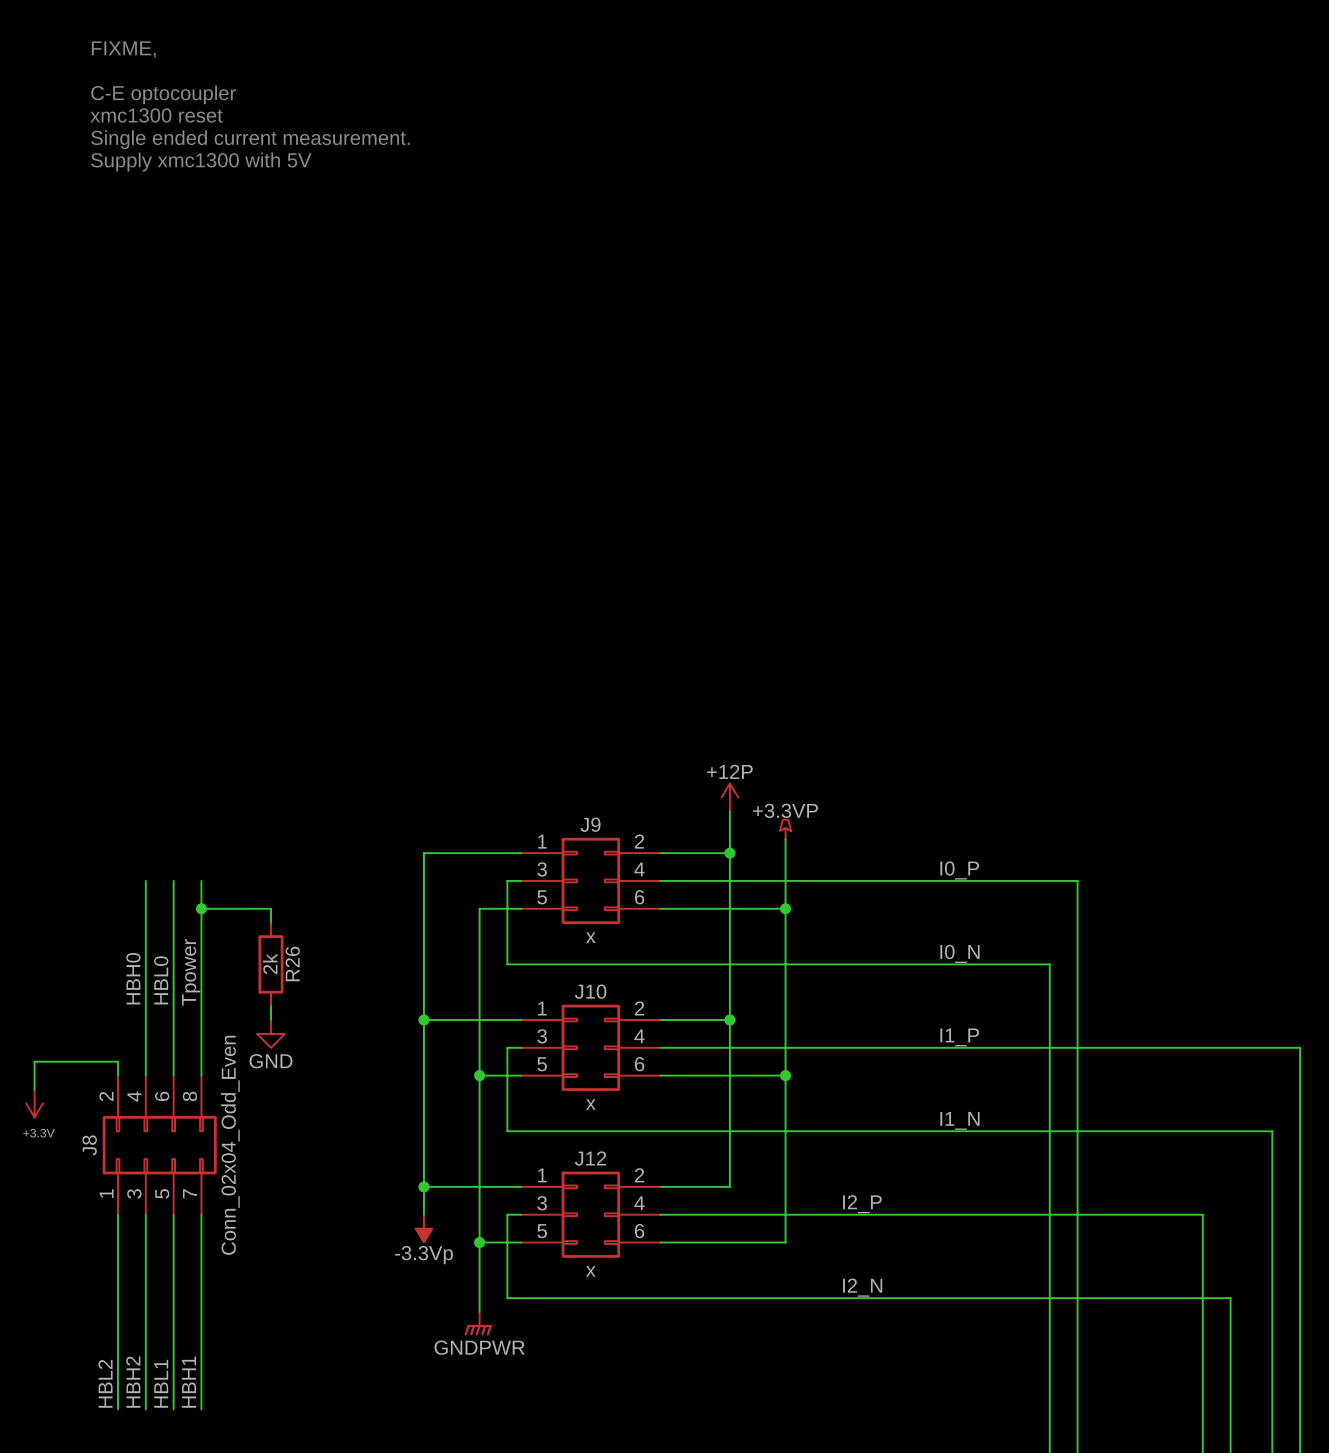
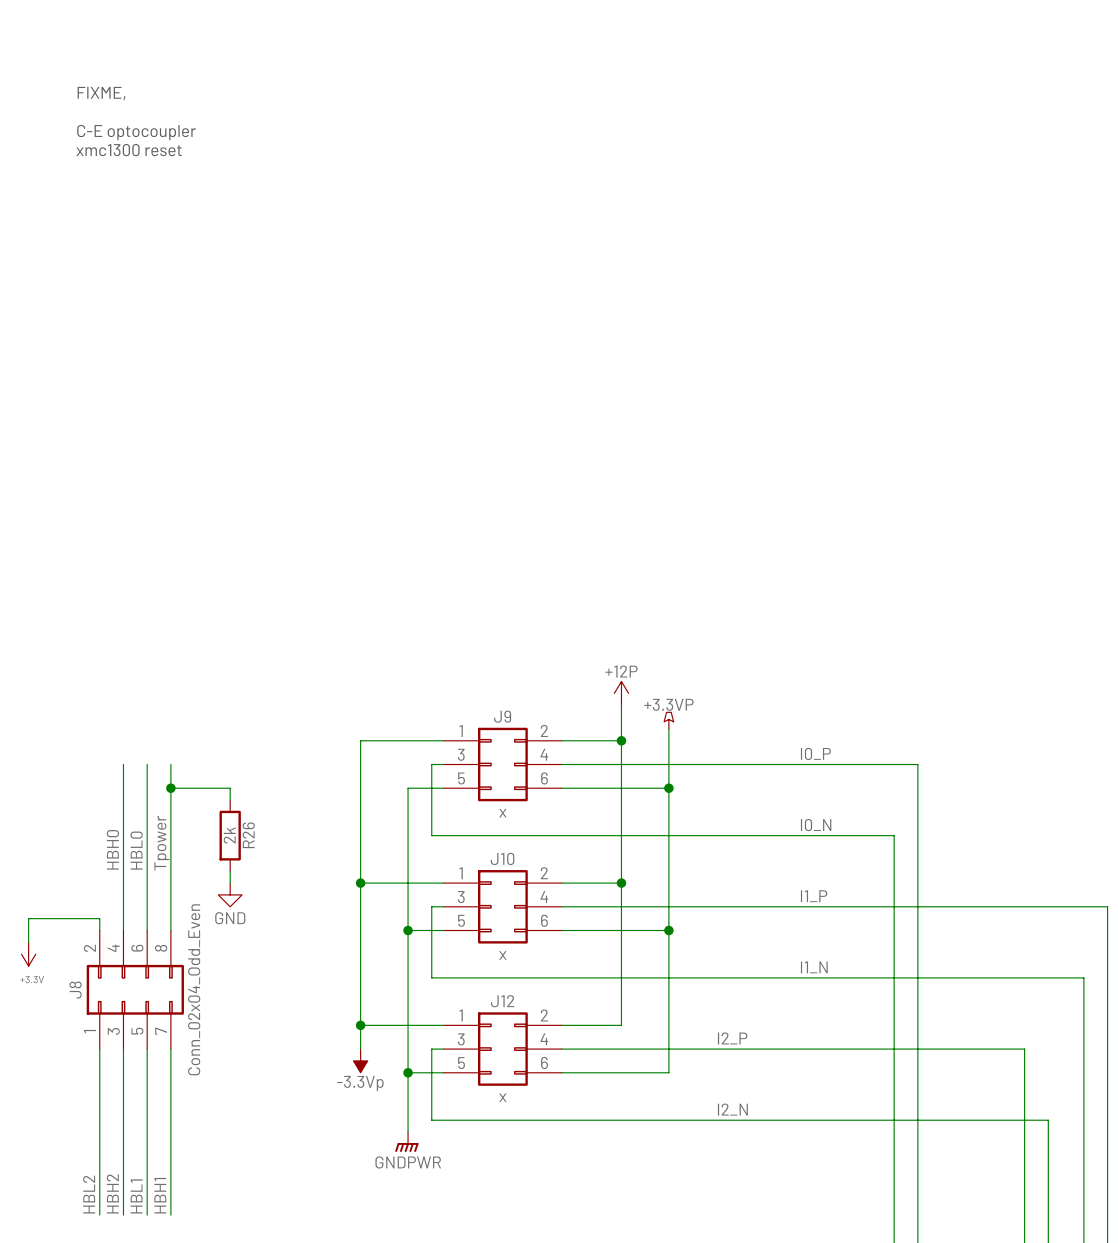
text: FIXME, (123, 49) -> none
text: C-E optocoupler (163, 94) -> FIXME, (101, 93)
text: xmc1300 reset (156, 115) -> none
text: Single ended current measurement. (250, 139) -> C-E optocoupler (136, 132)
text: Supply xmc1300 with 5V (201, 162) -> xmc1300 reset (129, 150)

